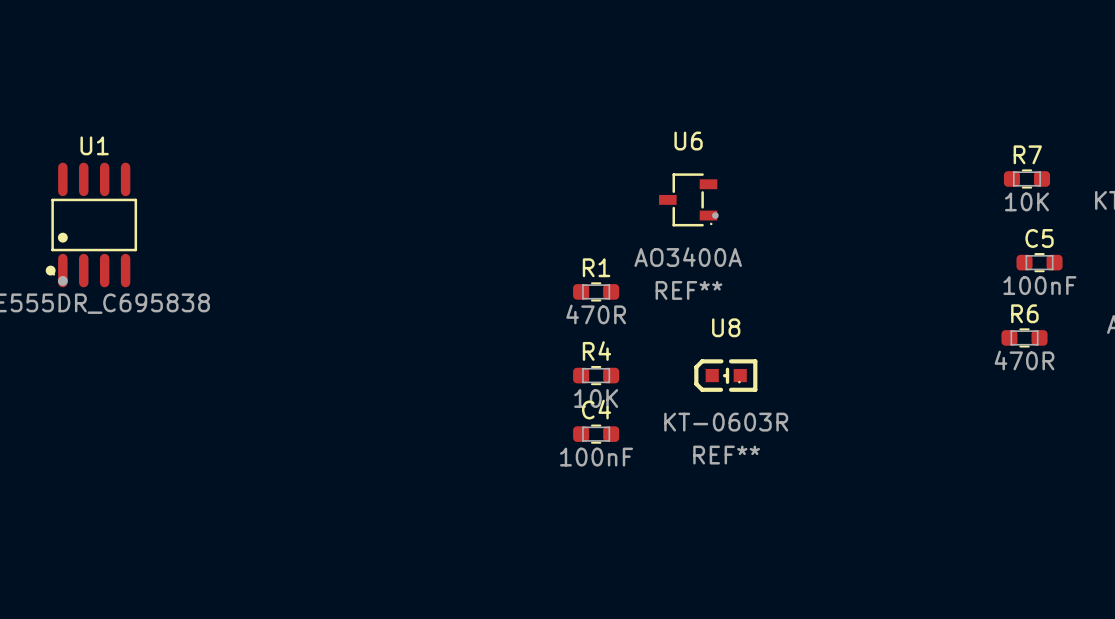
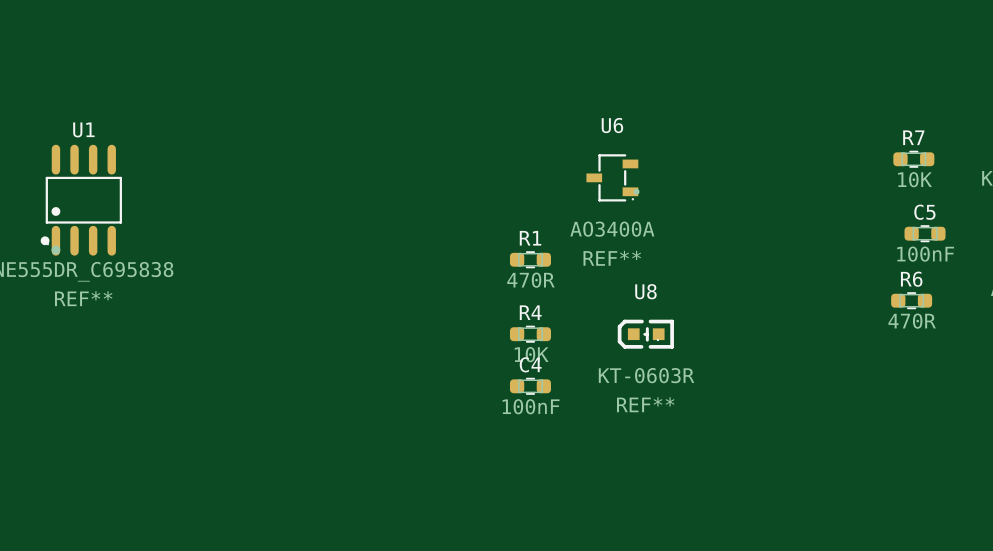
U1 text: none -> REF** (83, 298)

